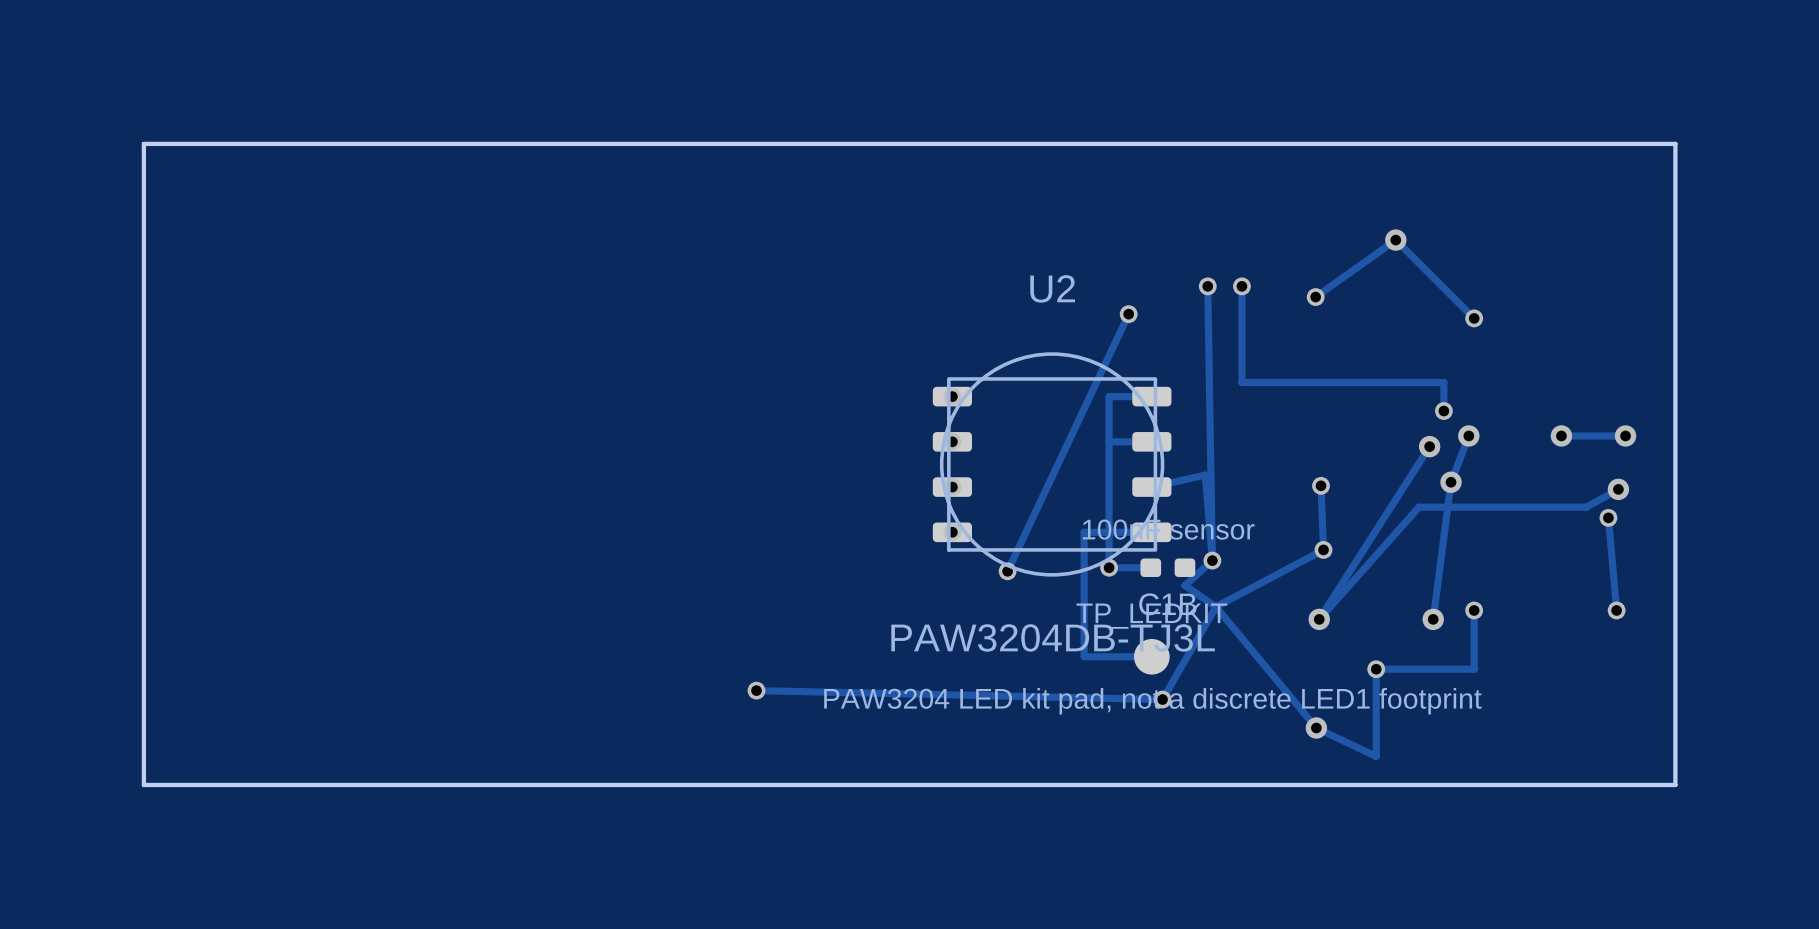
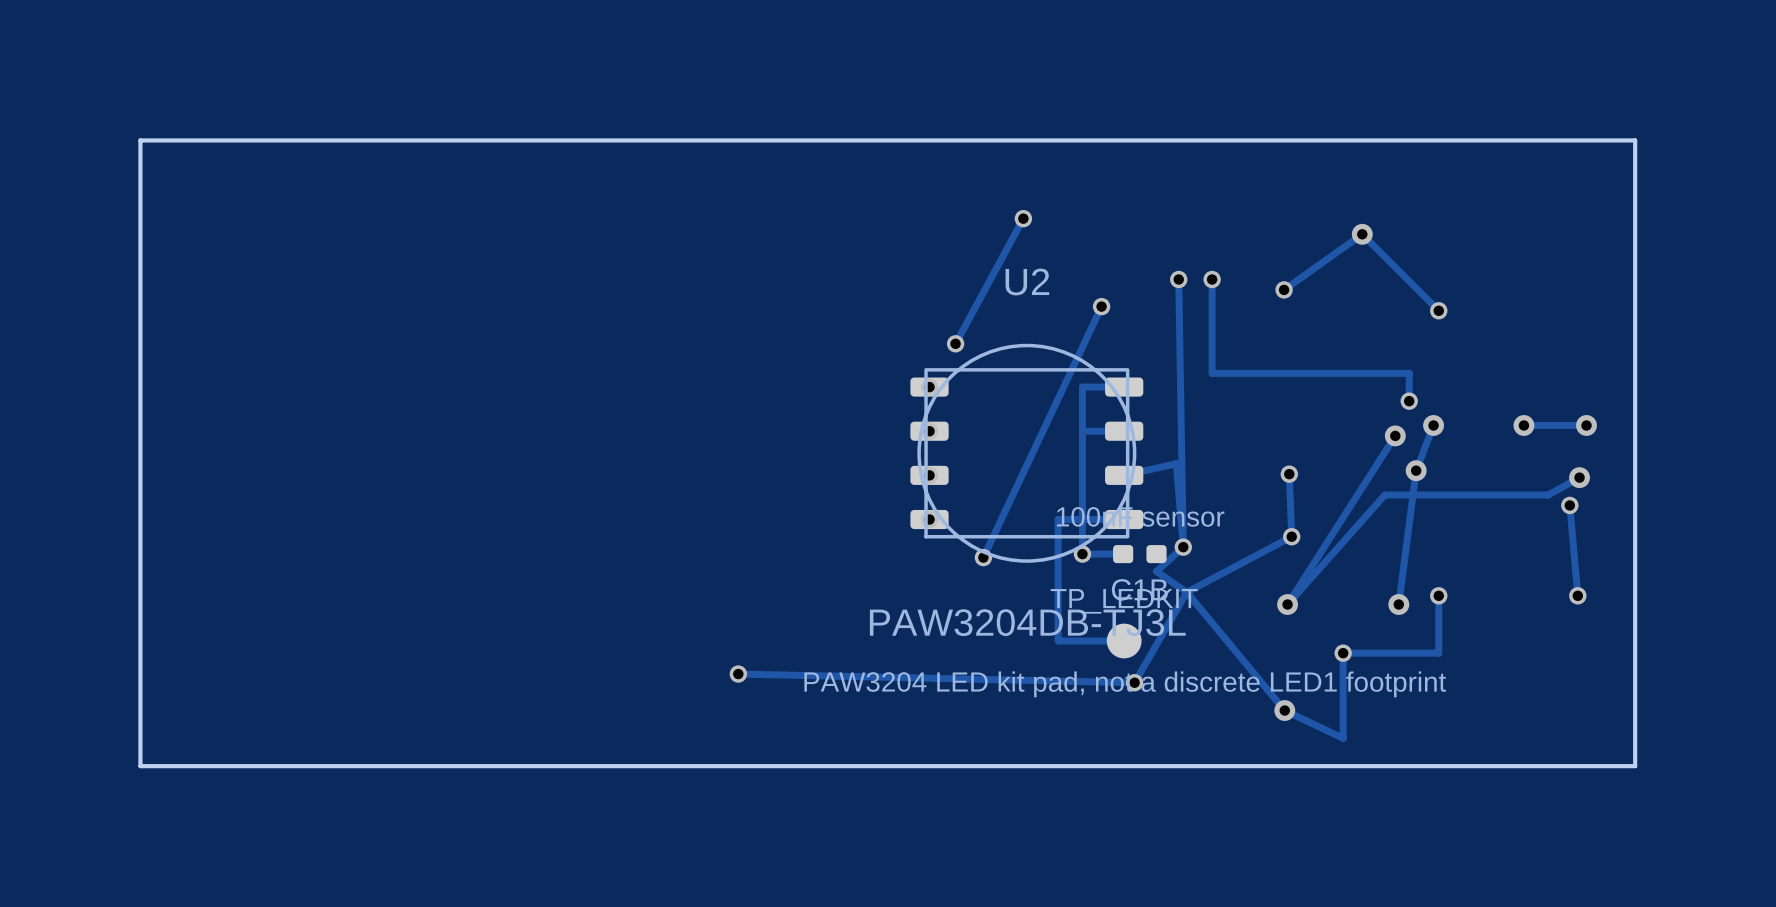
track: none -> (1023, 218) (955, 343)
via: none -> (1023, 218)
via: none -> (955, 343)

